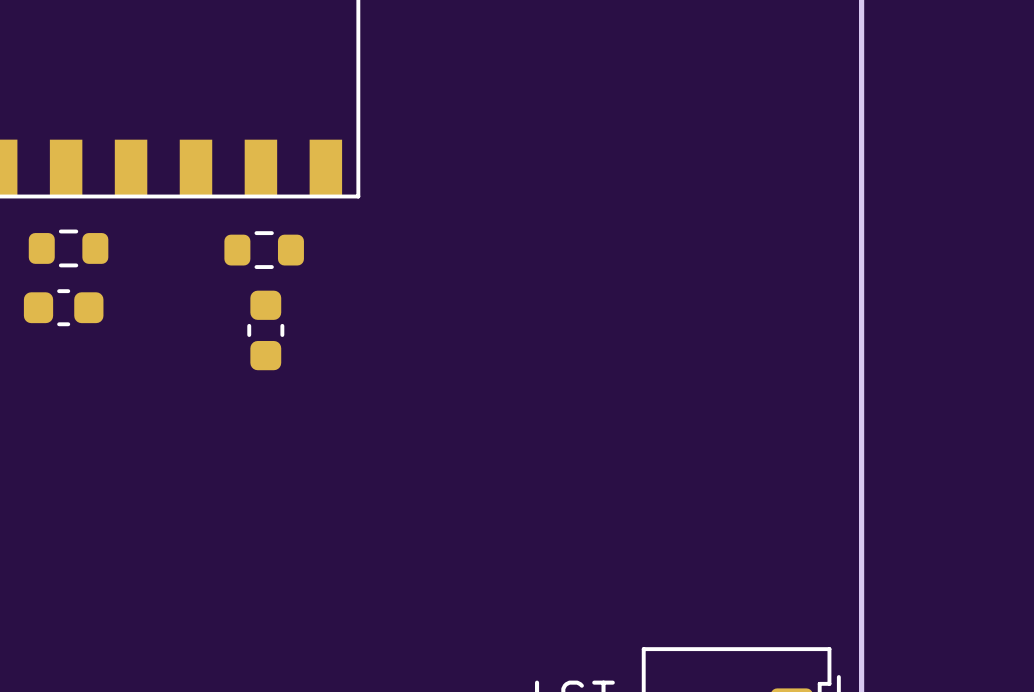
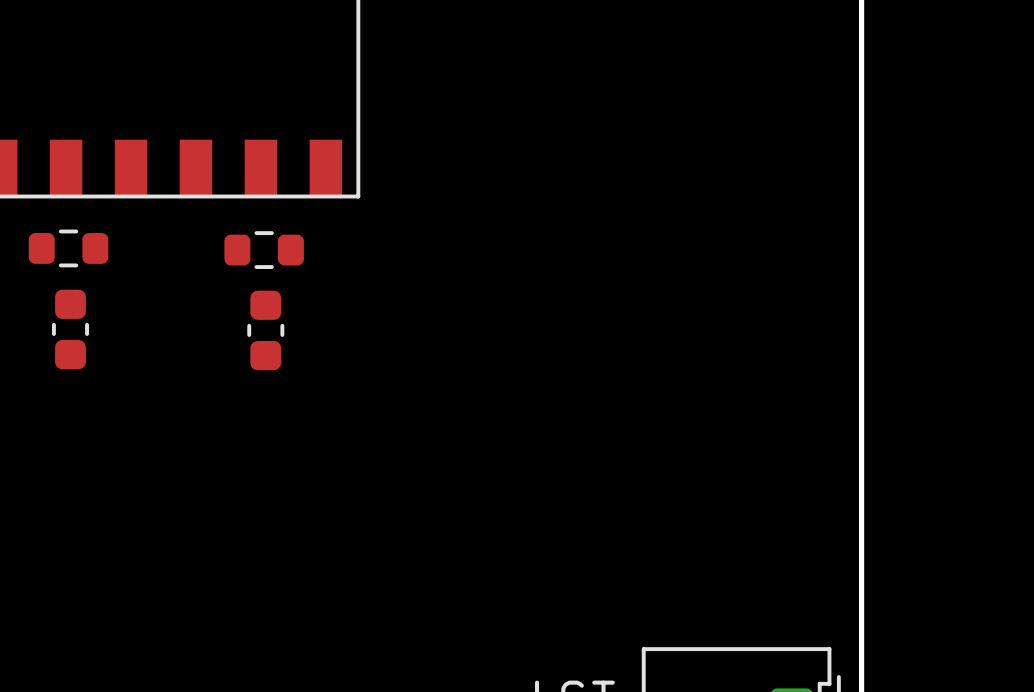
part rotation: 0° (63, 307) -> 90° clockwise (70, 329)

